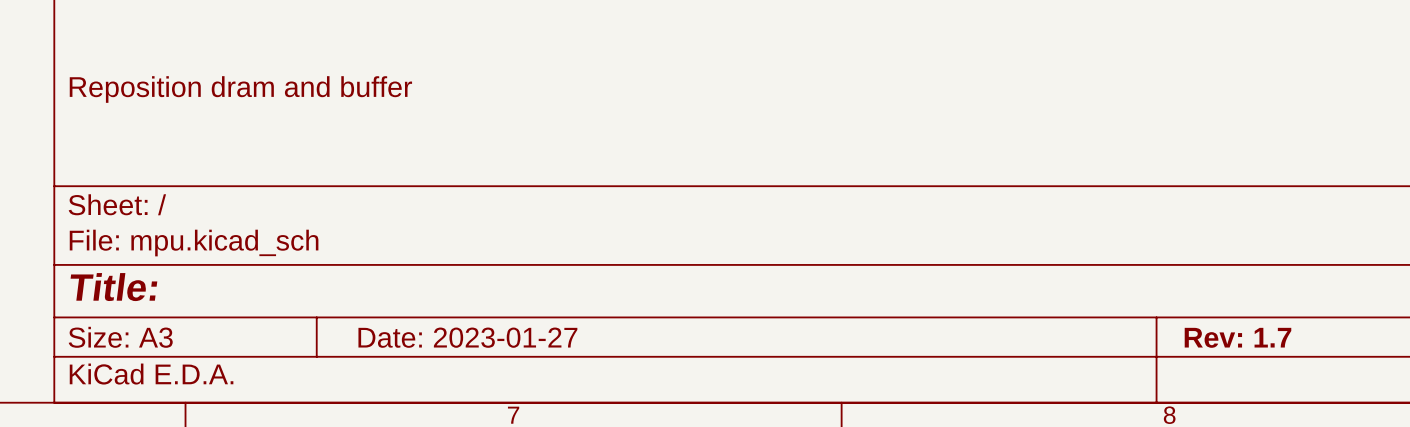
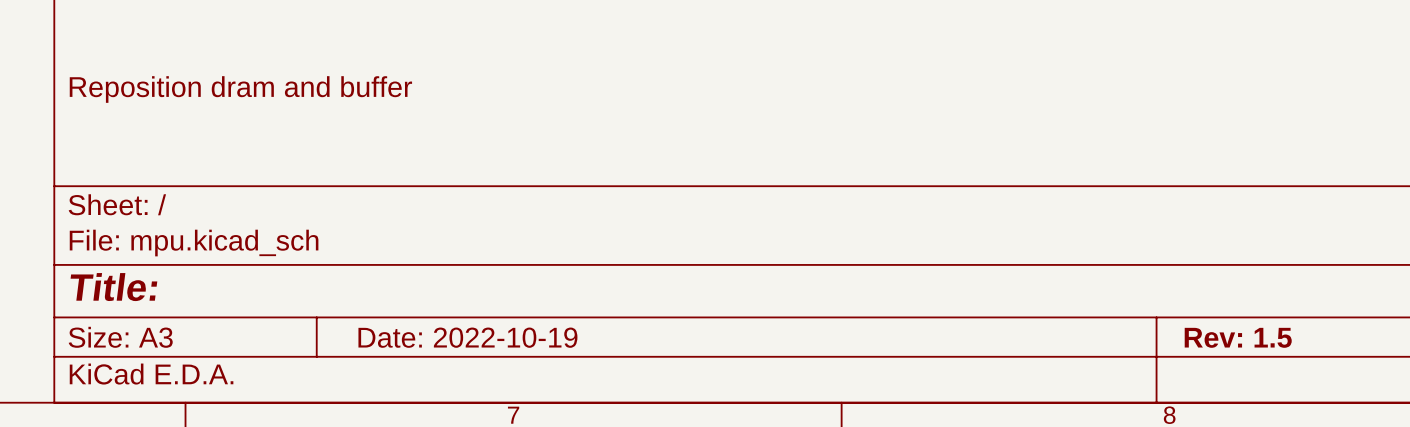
title block: Date: 2023-01-27 (467, 337) -> Date: 2022-10-19 (467, 337)
title block: Rev: 1.7 (1237, 337) -> Rev: 1.5 (1238, 337)

